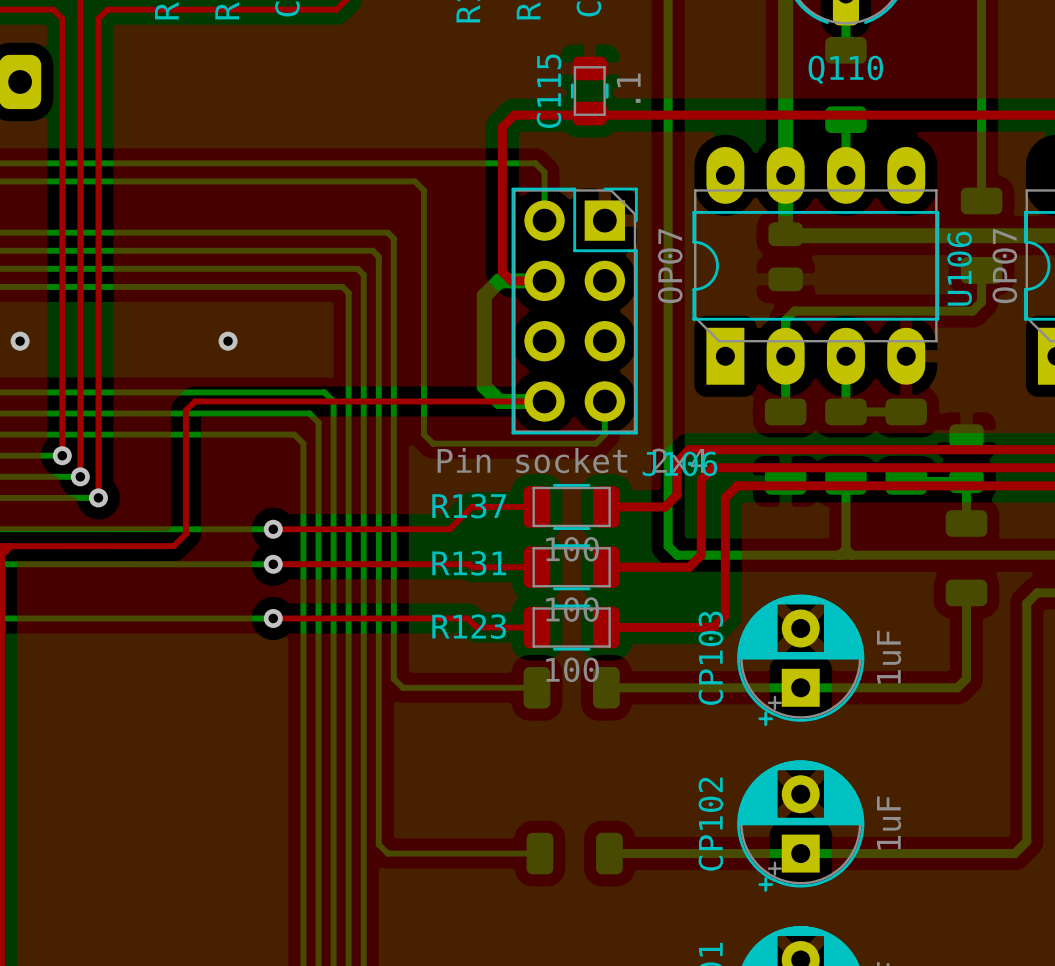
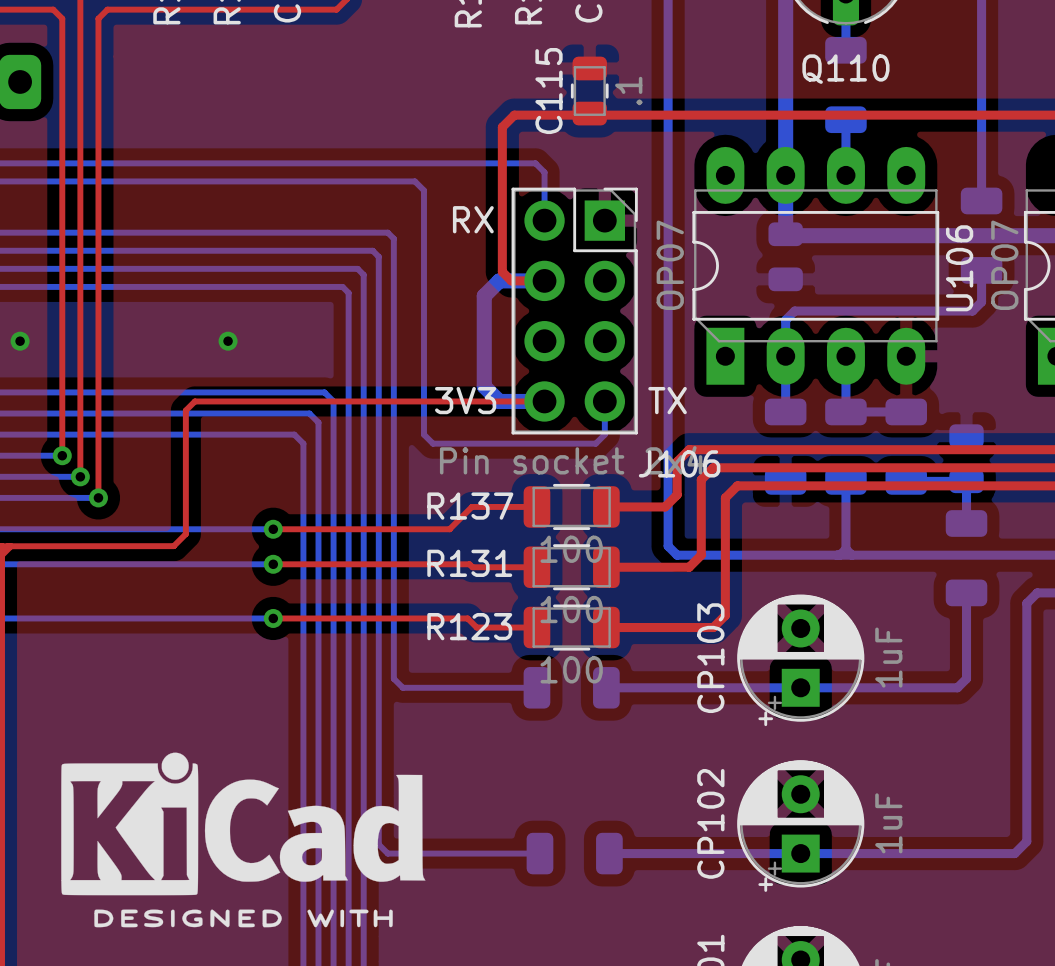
text: none -> RX (473, 219)
text: none -> 3V3 (465, 400)
text: none -> TX (667, 400)
drawing: none -> [61, 752, 426, 928]

